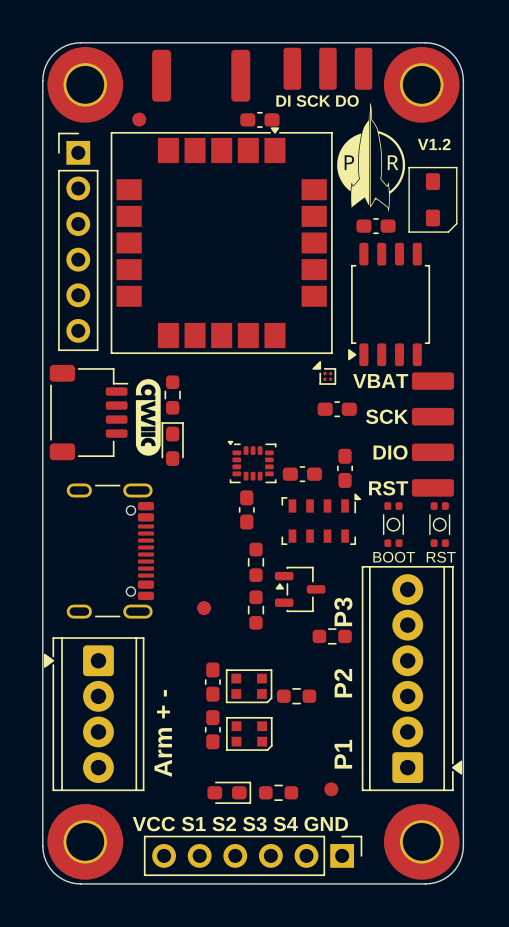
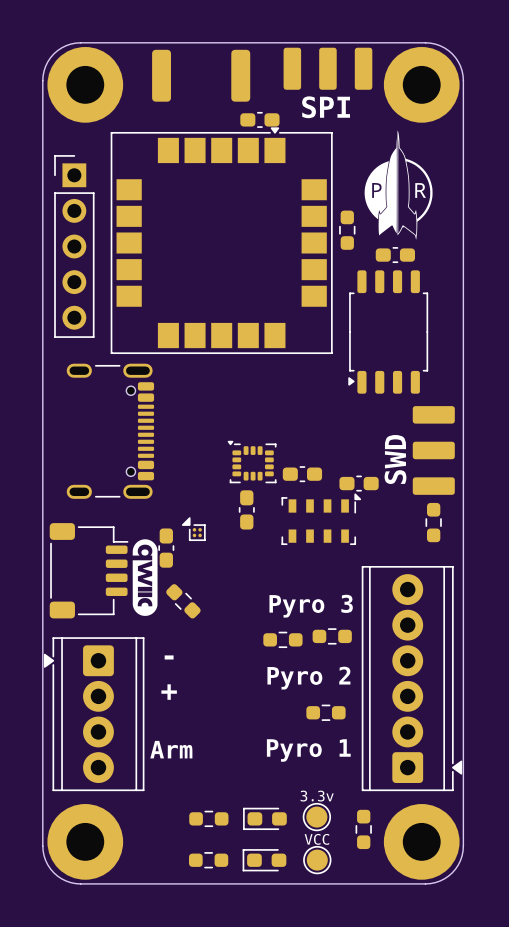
text: DI SCK DO (317, 101) -> none
text: none -> SPI (326, 107)
part: (139, 119) -> none
part footprint: [58, 132, 99, 352] -> [54, 155, 95, 338]
text: V1.2 (434, 144) -> none
drawing position: (371, 157) -> (398, 185)
part: (432, 199) -> none
part position: (376, 226) -> (395, 255)
part: none -> (347, 230)
part: (389, 304) -> none
part: none -> (388, 332)
part position: (324, 372) -> (193, 529)
text: VBAT (380, 381) -> none
part: (172, 395) -> none
part: (337, 409) -> none
part position: (89, 412) -> (89, 570)
text: SCK (387, 416) -> none
drawing position: (148, 417) -> (145, 577)
part: (432, 434) -> none
part: (172, 444) -> none
part: none -> (433, 450)
text: DIO (390, 452) -> none
part rotation: 0° (345, 468) -> 90° clockwise (359, 483)
text: RST (388, 488) -> SWD (395, 459)
part footprint: [429, 502, 451, 548] -> [425, 502, 442, 543]
part: (393, 524) -> none
part: none -> (166, 548)
part position: (110, 551) -> (110, 431)
text: BOOT (394, 557) -> none
text: RST (441, 557) -> none
part: (256, 562) -> none
part: (300, 589) -> none
part: none -> (183, 601)
text: none -> Pyro 3 (311, 606)
part: (204, 608) -> none
part: (256, 610) -> none
text: P3 (343, 611) -> none
part: none -> (282, 639)
text: none -> - (169, 657)
text: none -> Pyro 2 (308, 678)
part: (212, 682) -> none
text: P2 (343, 683) -> none
part: (249, 686) -> none
text: none -> + (169, 692)
part: (296, 696) -> none
part: none -> (325, 712)
part: (212, 729) -> none
text: Arm + - (163, 733) -> none
part: (249, 733) -> none
text: none -> Arm (171, 749)
text: none -> Pyro 1 (308, 750)
text: P1 (343, 754) -> none
part: (331, 789) -> none
part rotation: 0° (229, 792) -> 180° (264, 818)
part position: (229, 792) -> (264, 818)
part: (278, 792) -> none
part: none -> 3.3v (316, 817)
part: none -> (208, 818)
text: VCC S1 S2 S3 S4 GND (240, 824) -> none
part: none -> (363, 829)
part footprint: [143, 835, 363, 877] -> [242, 849, 287, 872]
part: none -> (208, 860)
part: none -> VCC (317, 860)

